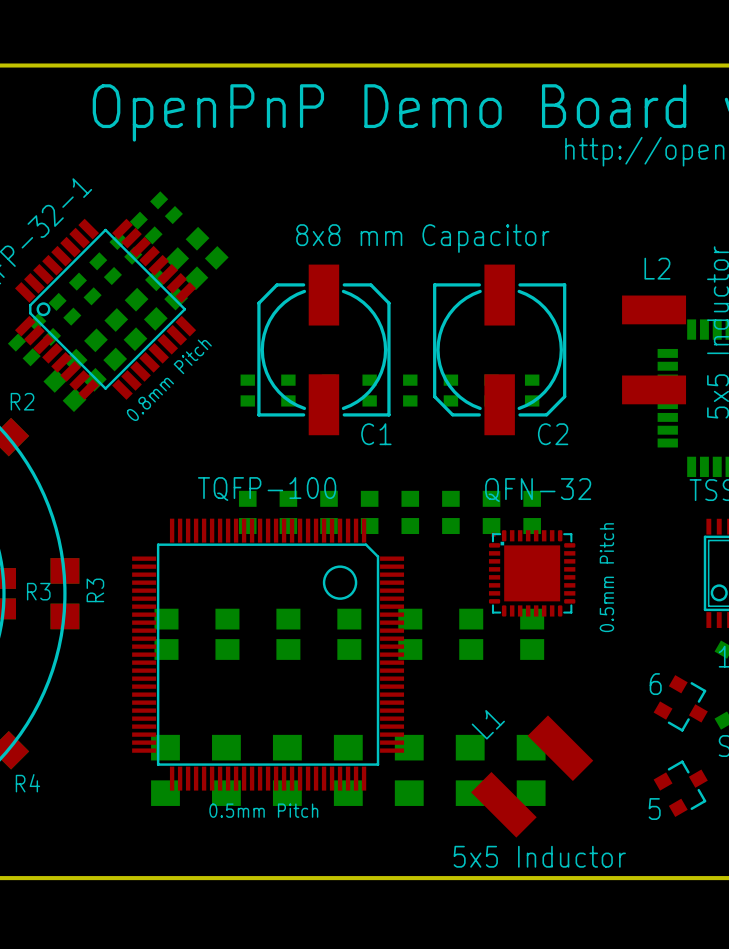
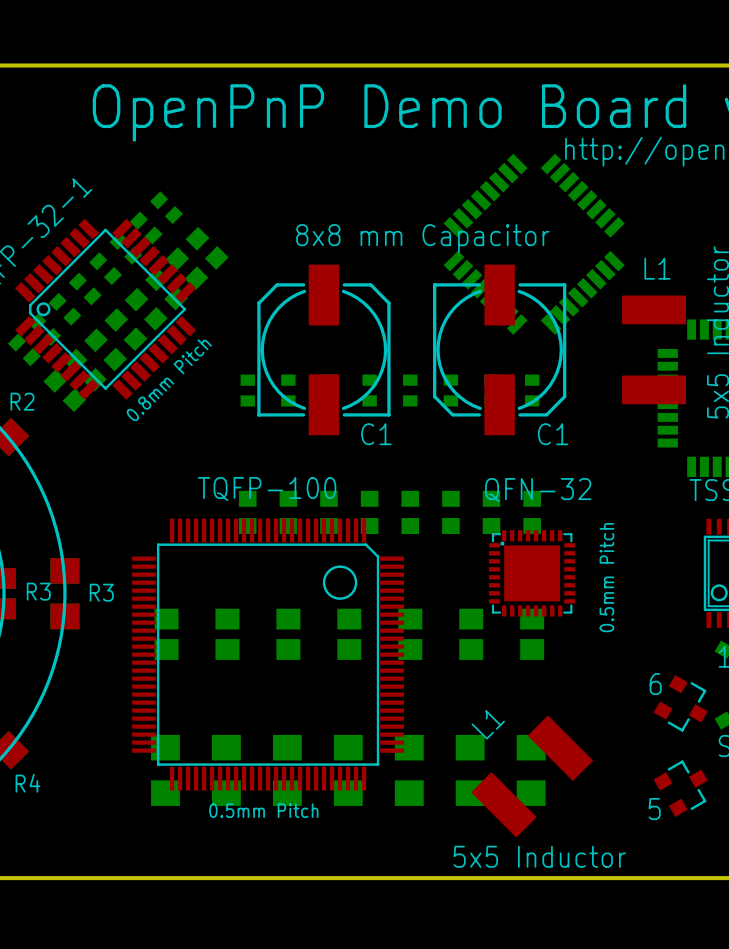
part: none -> (534, 244)
text: L2 (657, 268) -> L1 (657, 268)
text: C2 (553, 434) -> C1 (553, 434)
text rotation: 0° (95, 590) -> 90° clockwise (101, 592)

